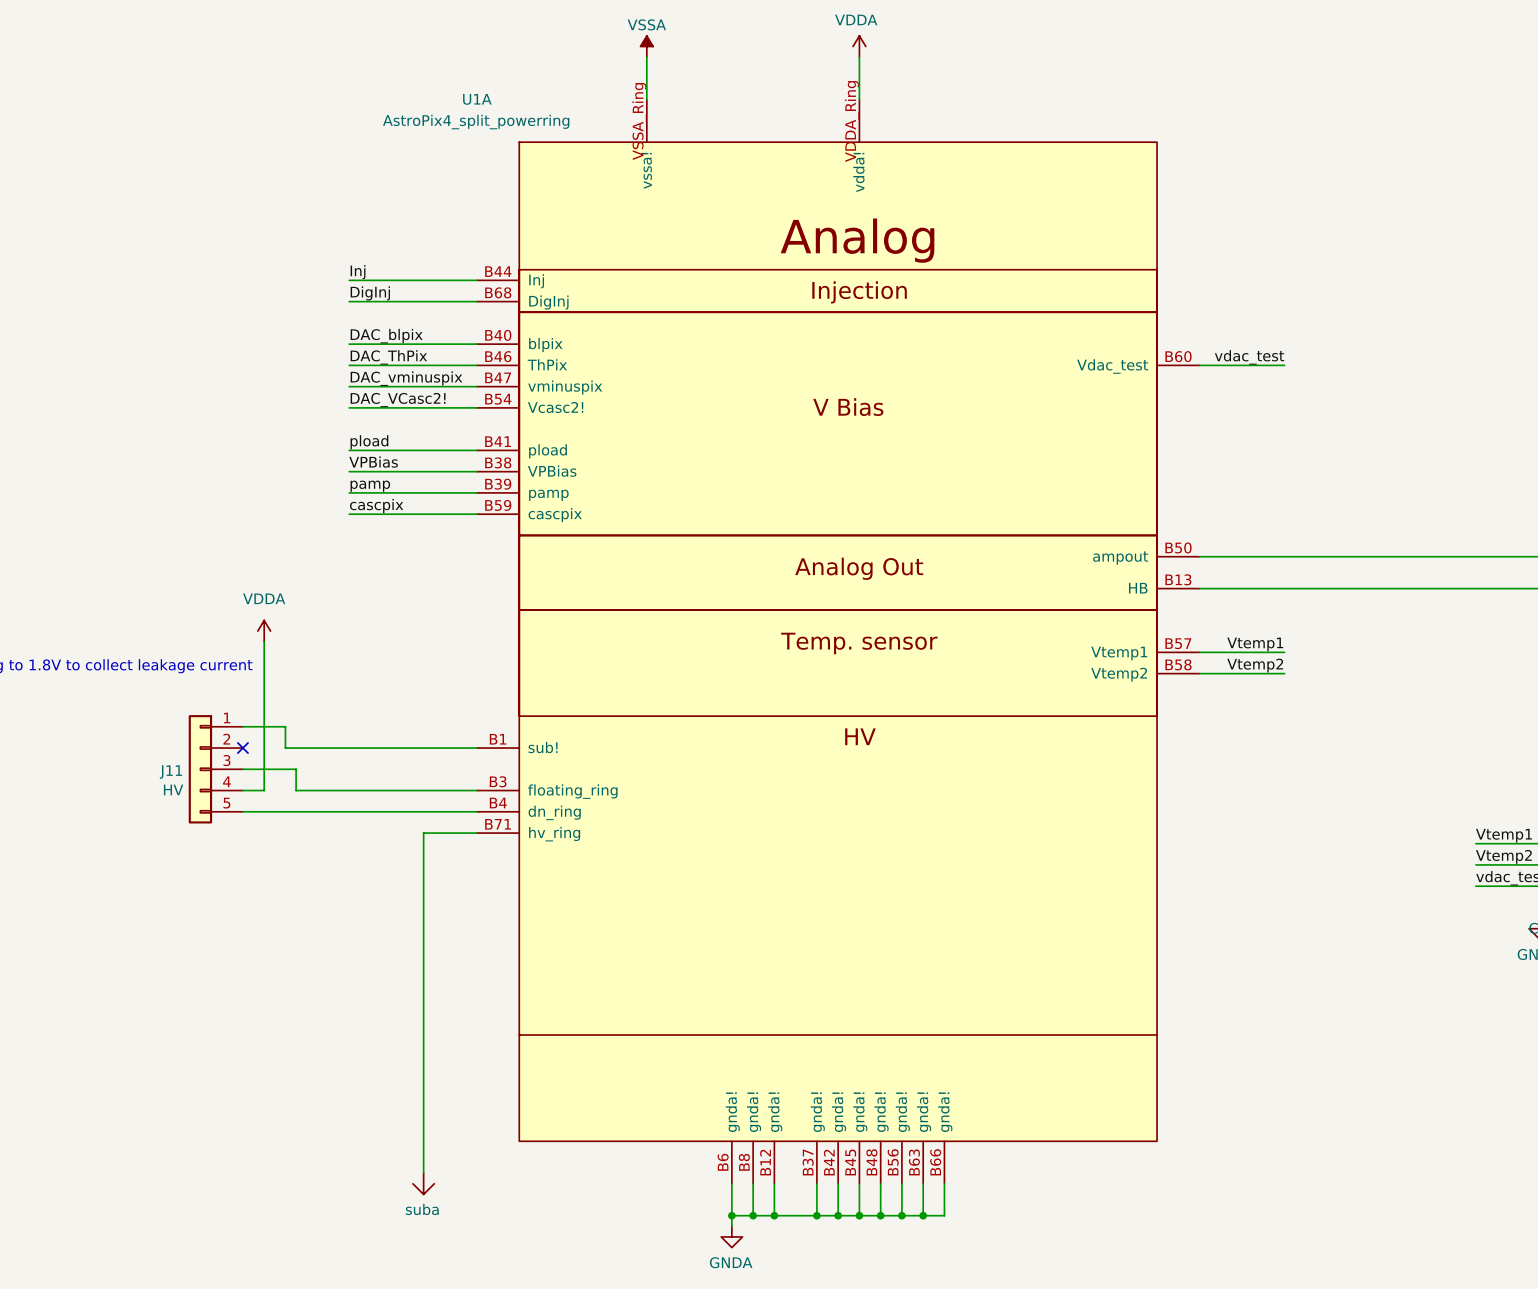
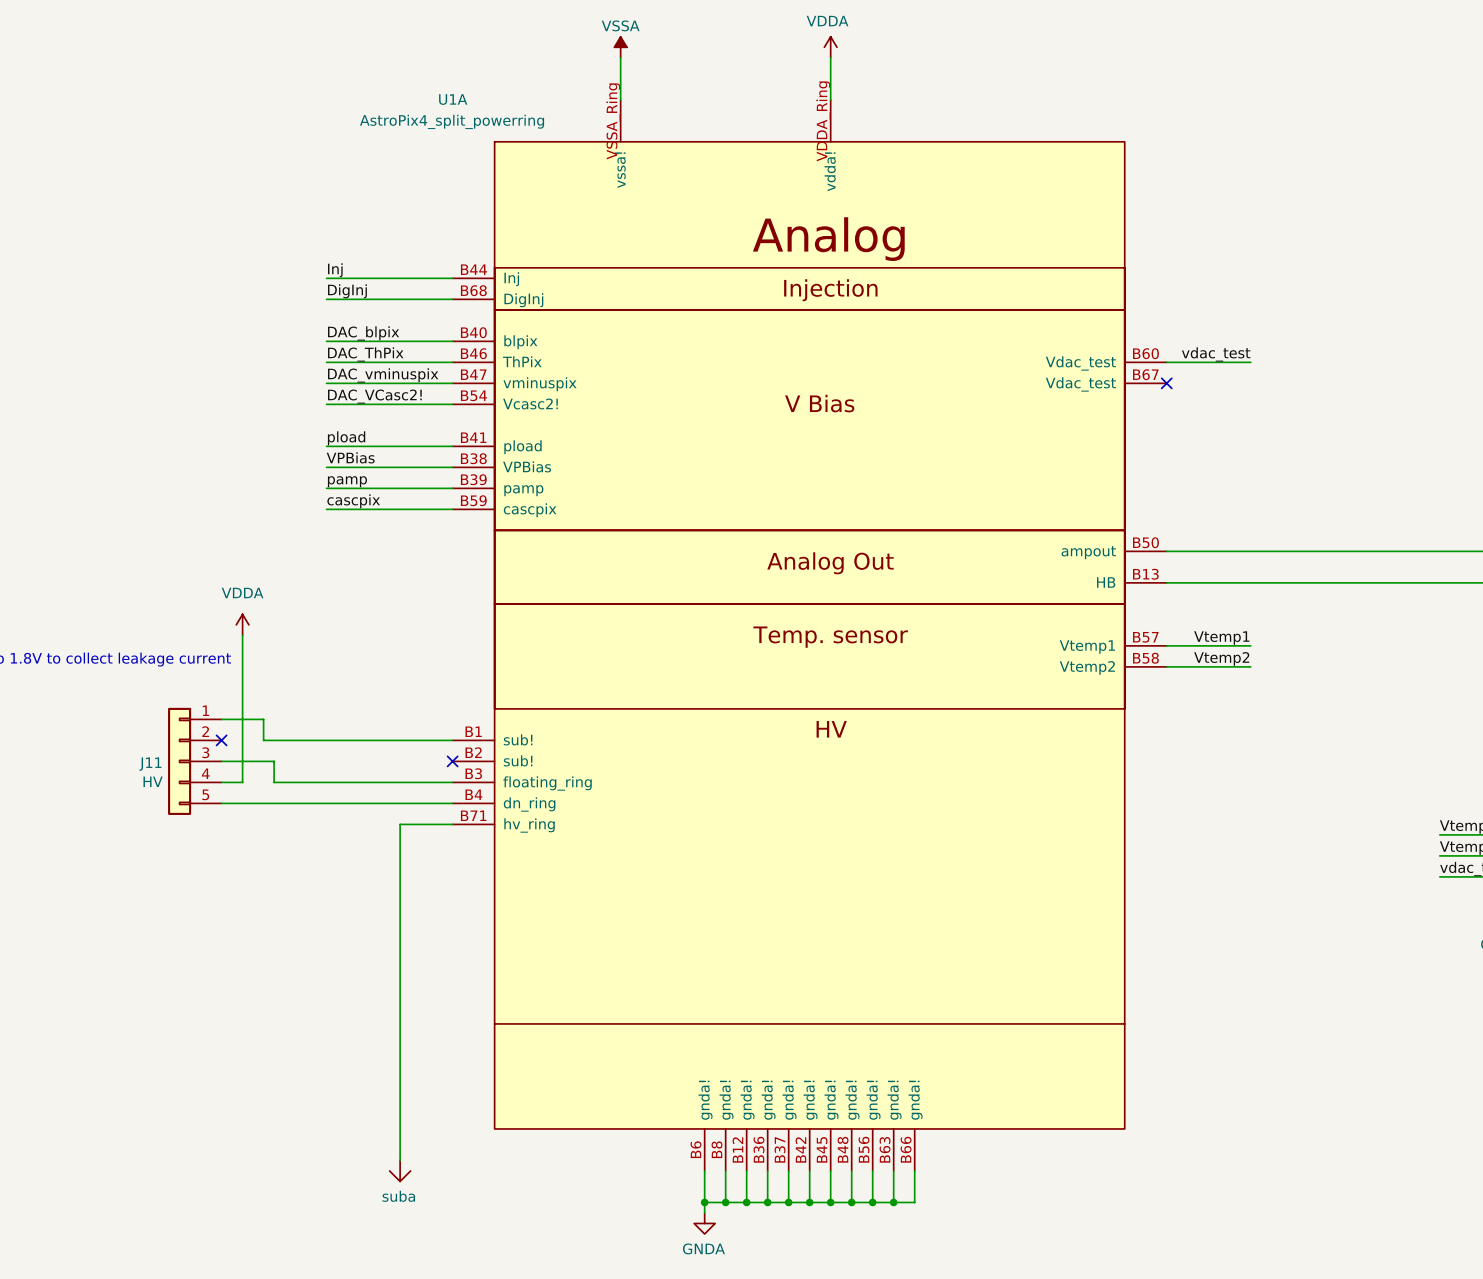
U1A symbol: [476, 99, 1200, 1184] -> [452, 99, 1167, 1171]
no-connect mark: none -> (1166, 383)
no-connect mark: none -> (452, 761)
wire: none -> (767, 1170) (767, 1202)
junction: none -> (767, 1202)

